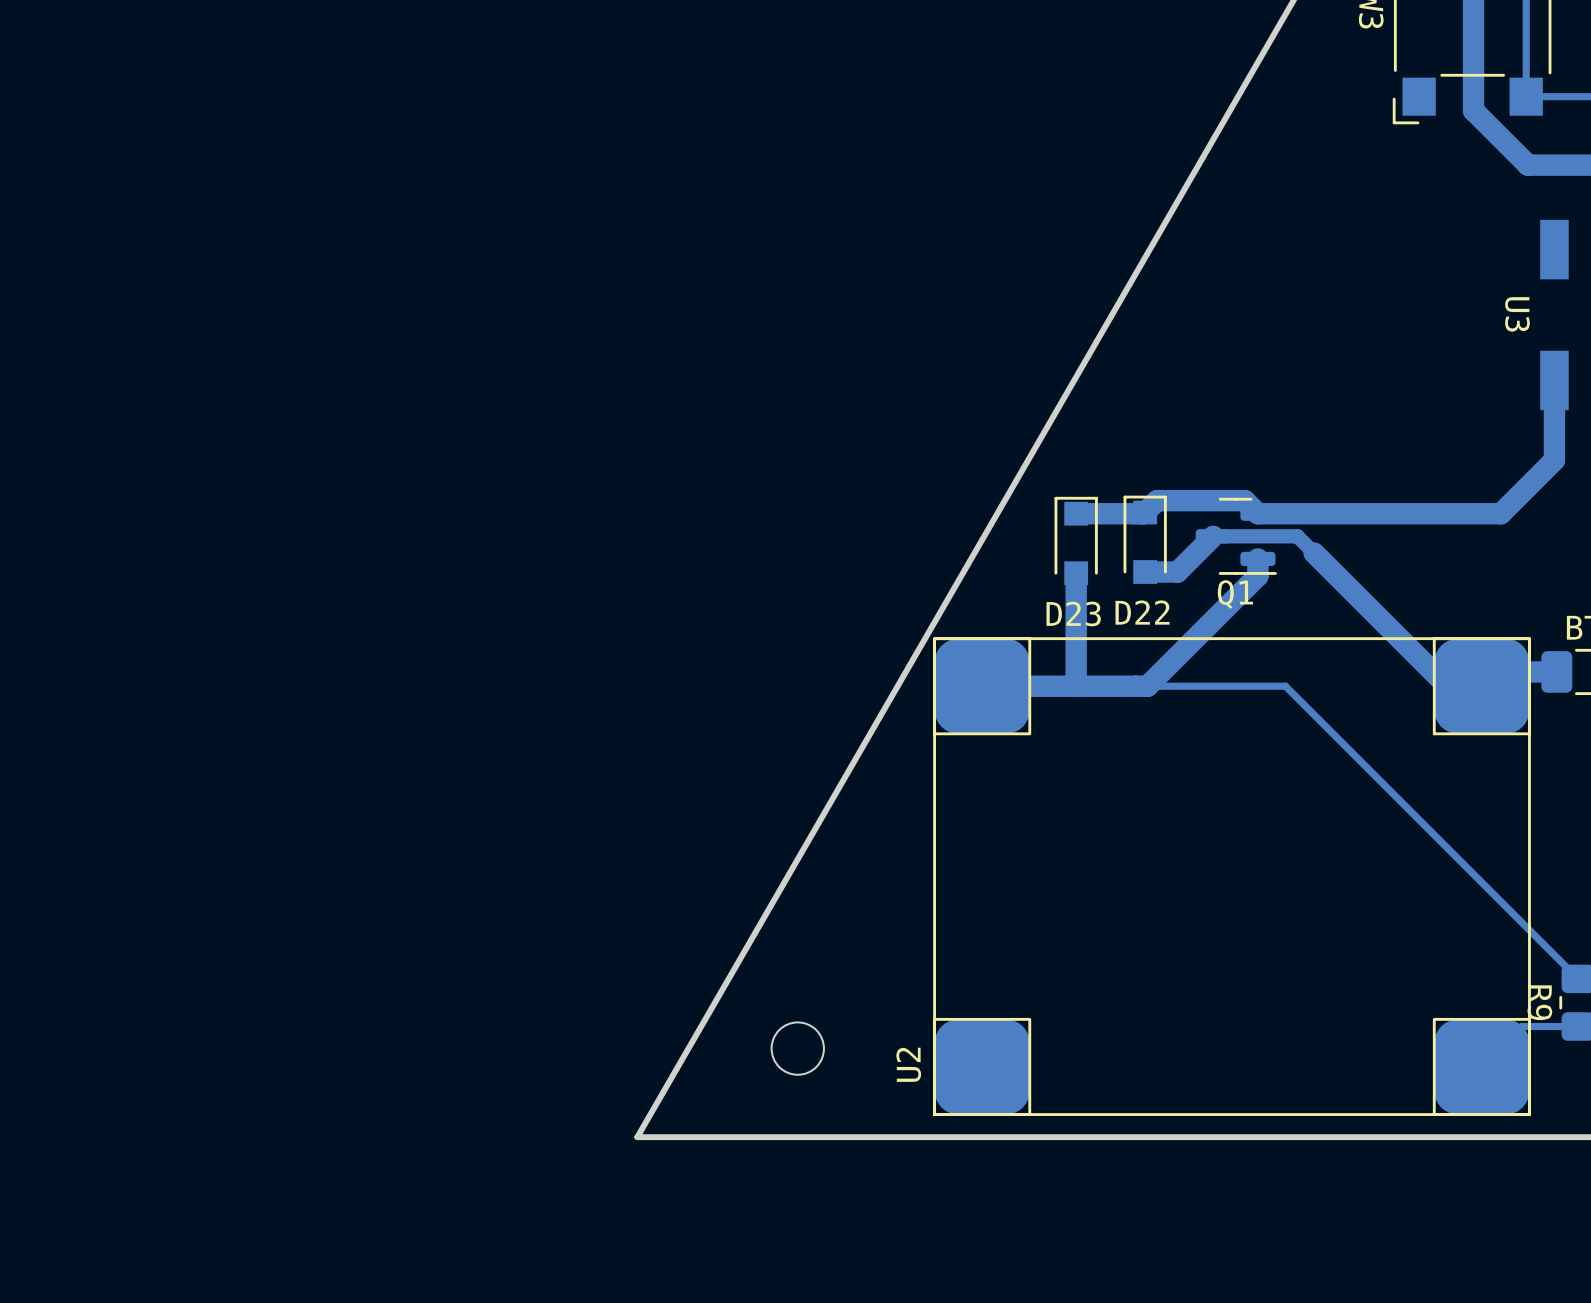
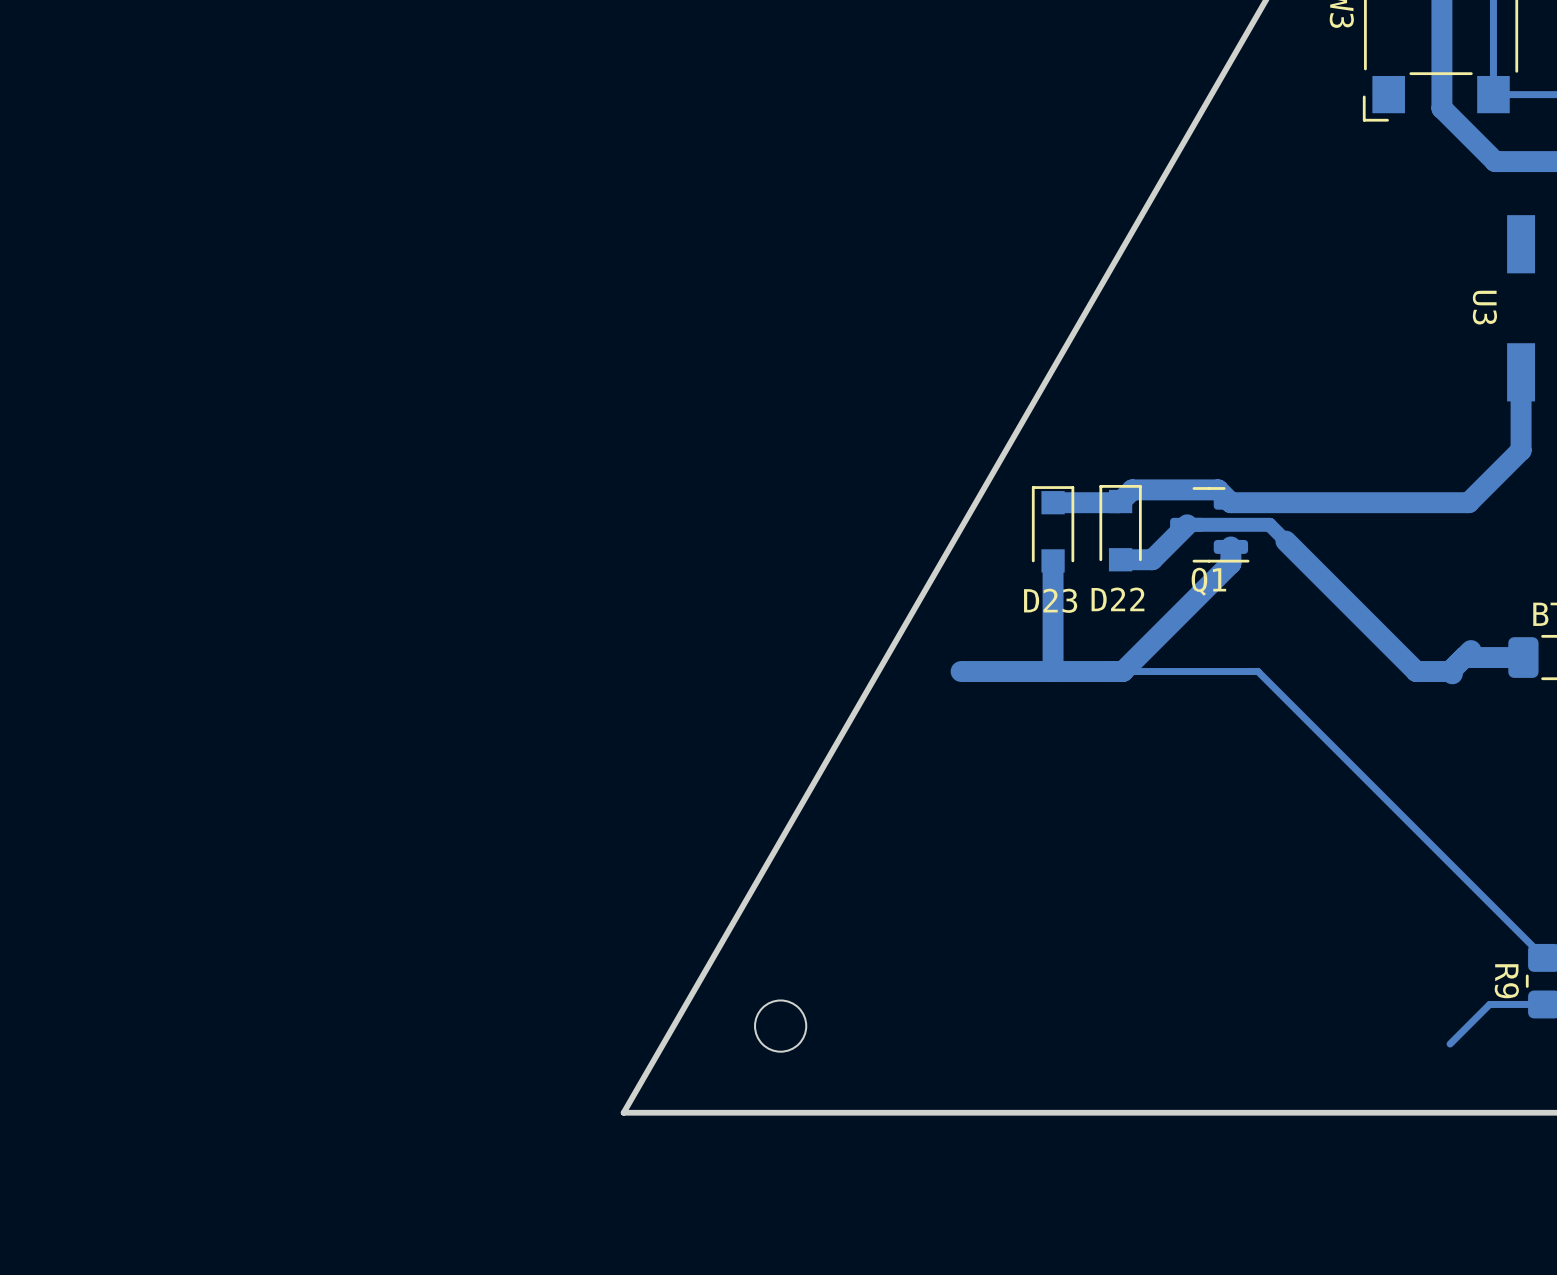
U2: (1232, 876) -> none

